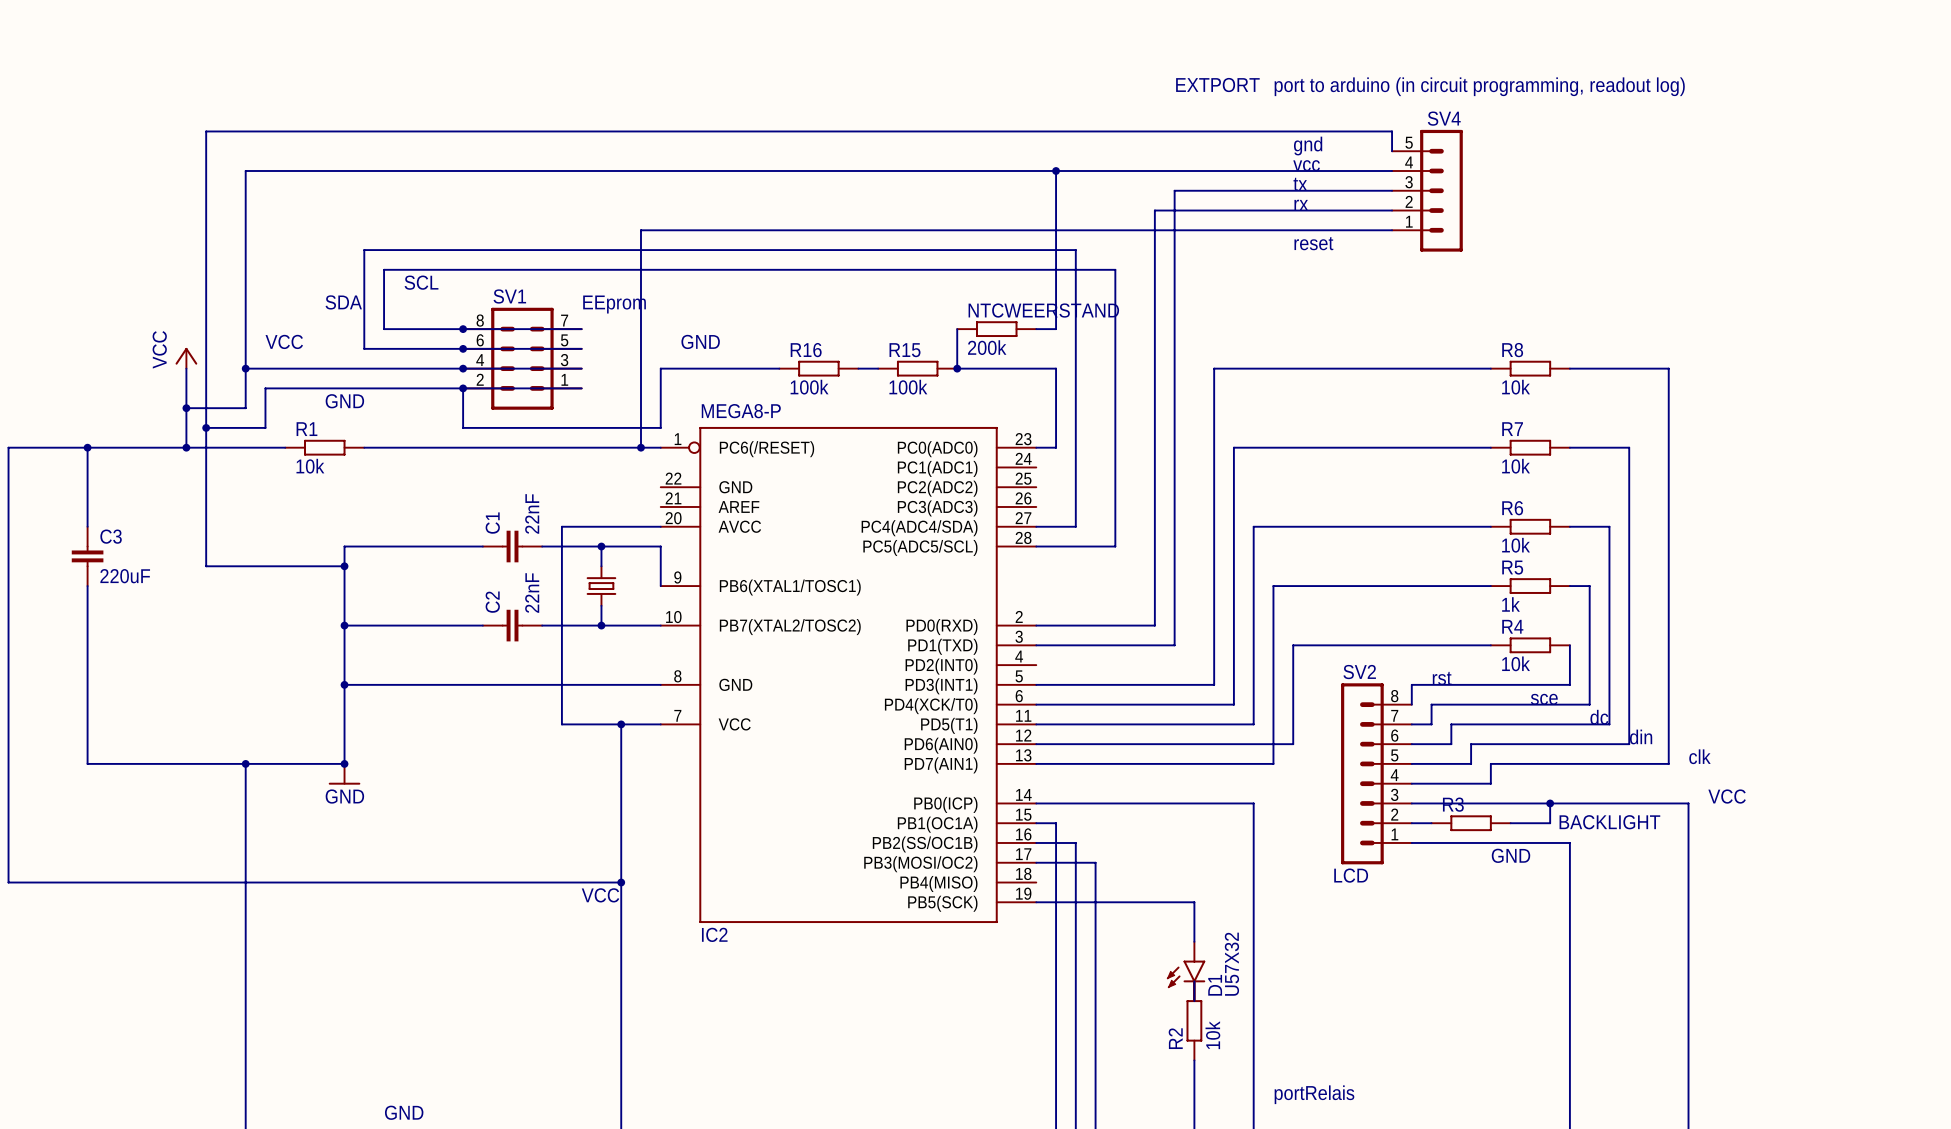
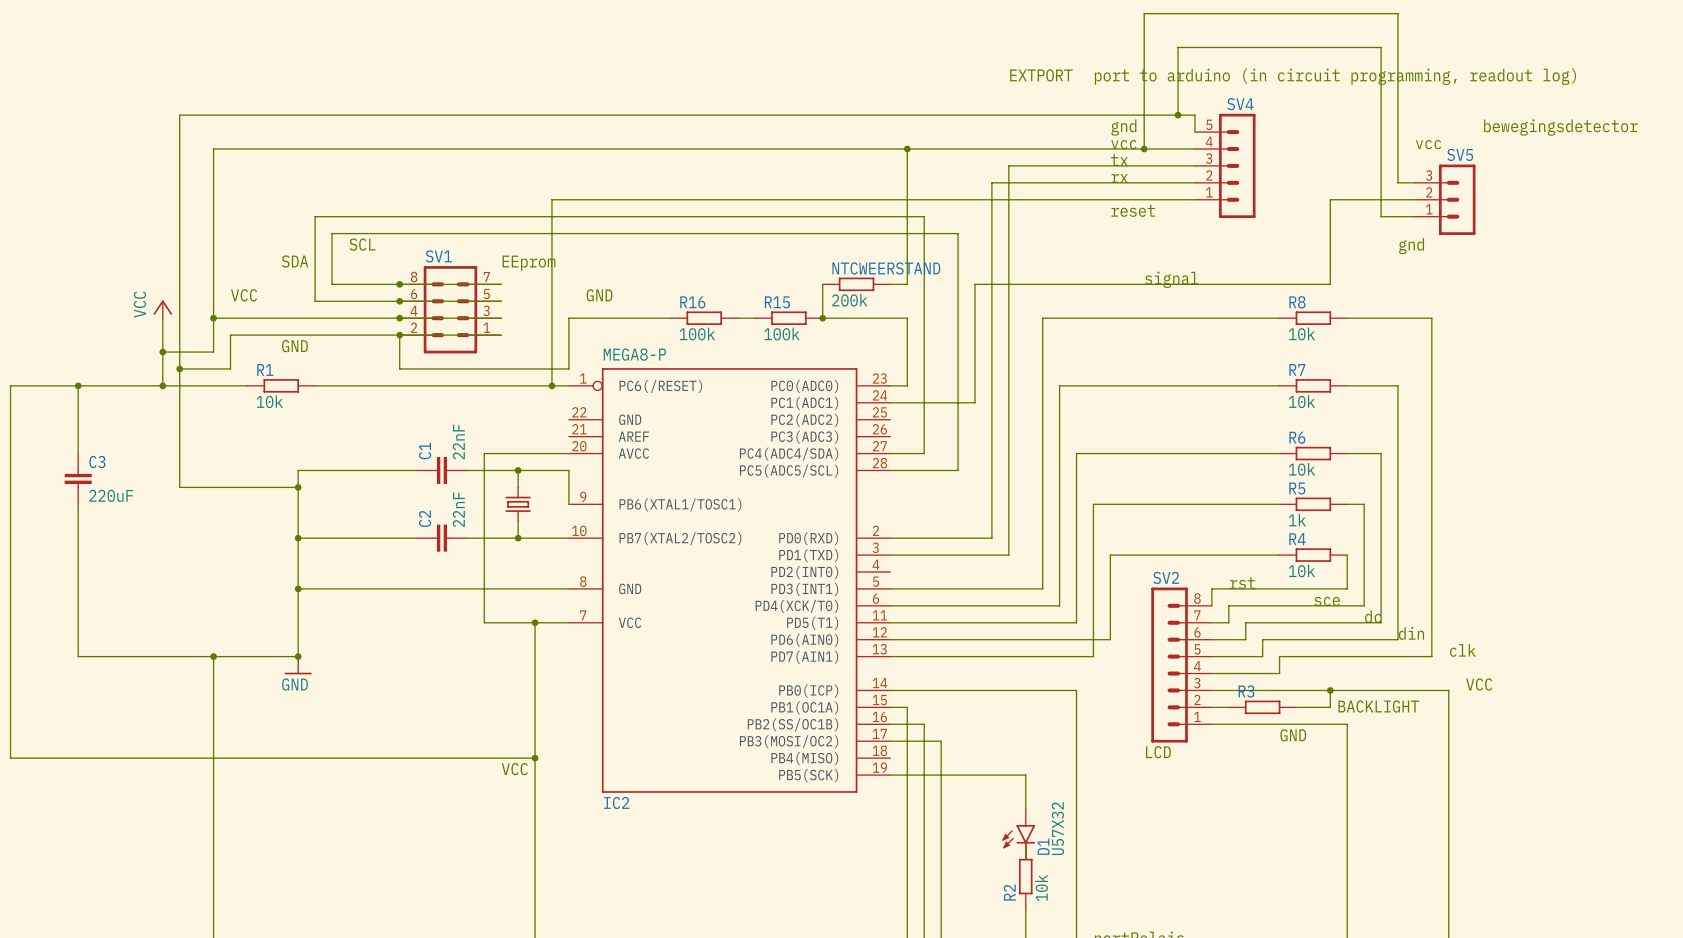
wire: none -> (1178, 115) (1178, 47) (1381, 47) (1381, 216) (1414, 216)
junction: none -> (1178, 115)
text: none -> bewegingsdetector (1560, 127)
text: none -> vcc (1428, 144)
wire: none -> (1144, 148) (1144, 13) (1398, 13) (1398, 182) (1414, 182)
junction: none -> (1144, 148)
wire: none -> (1414, 199) (1330, 199) (1330, 284) (974, 284) (974, 402) (890, 402)
SV5: none -> (1445, 199)
text: none -> gnd (1411, 246)
text: none -> signal (1171, 279)

